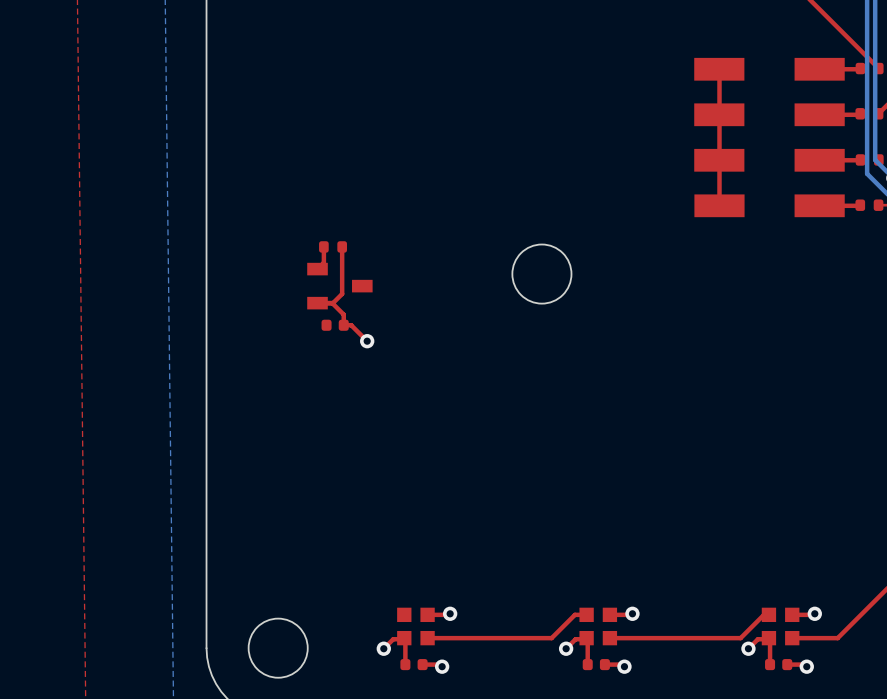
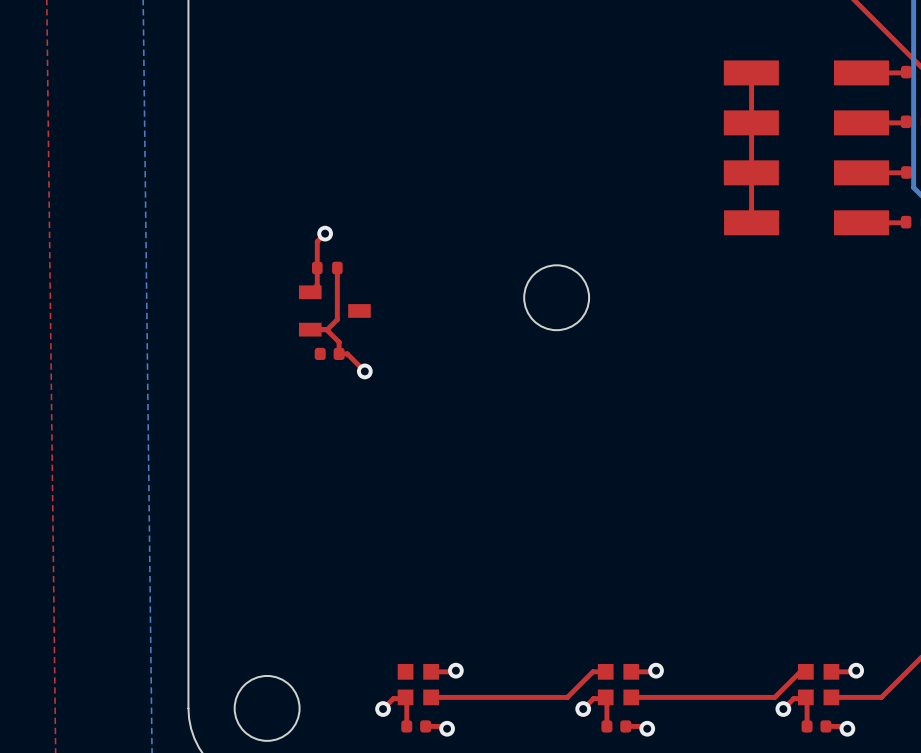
top track: none -> (325, 233) (317, 241) (317, 267)
via: none -> (325, 233)

